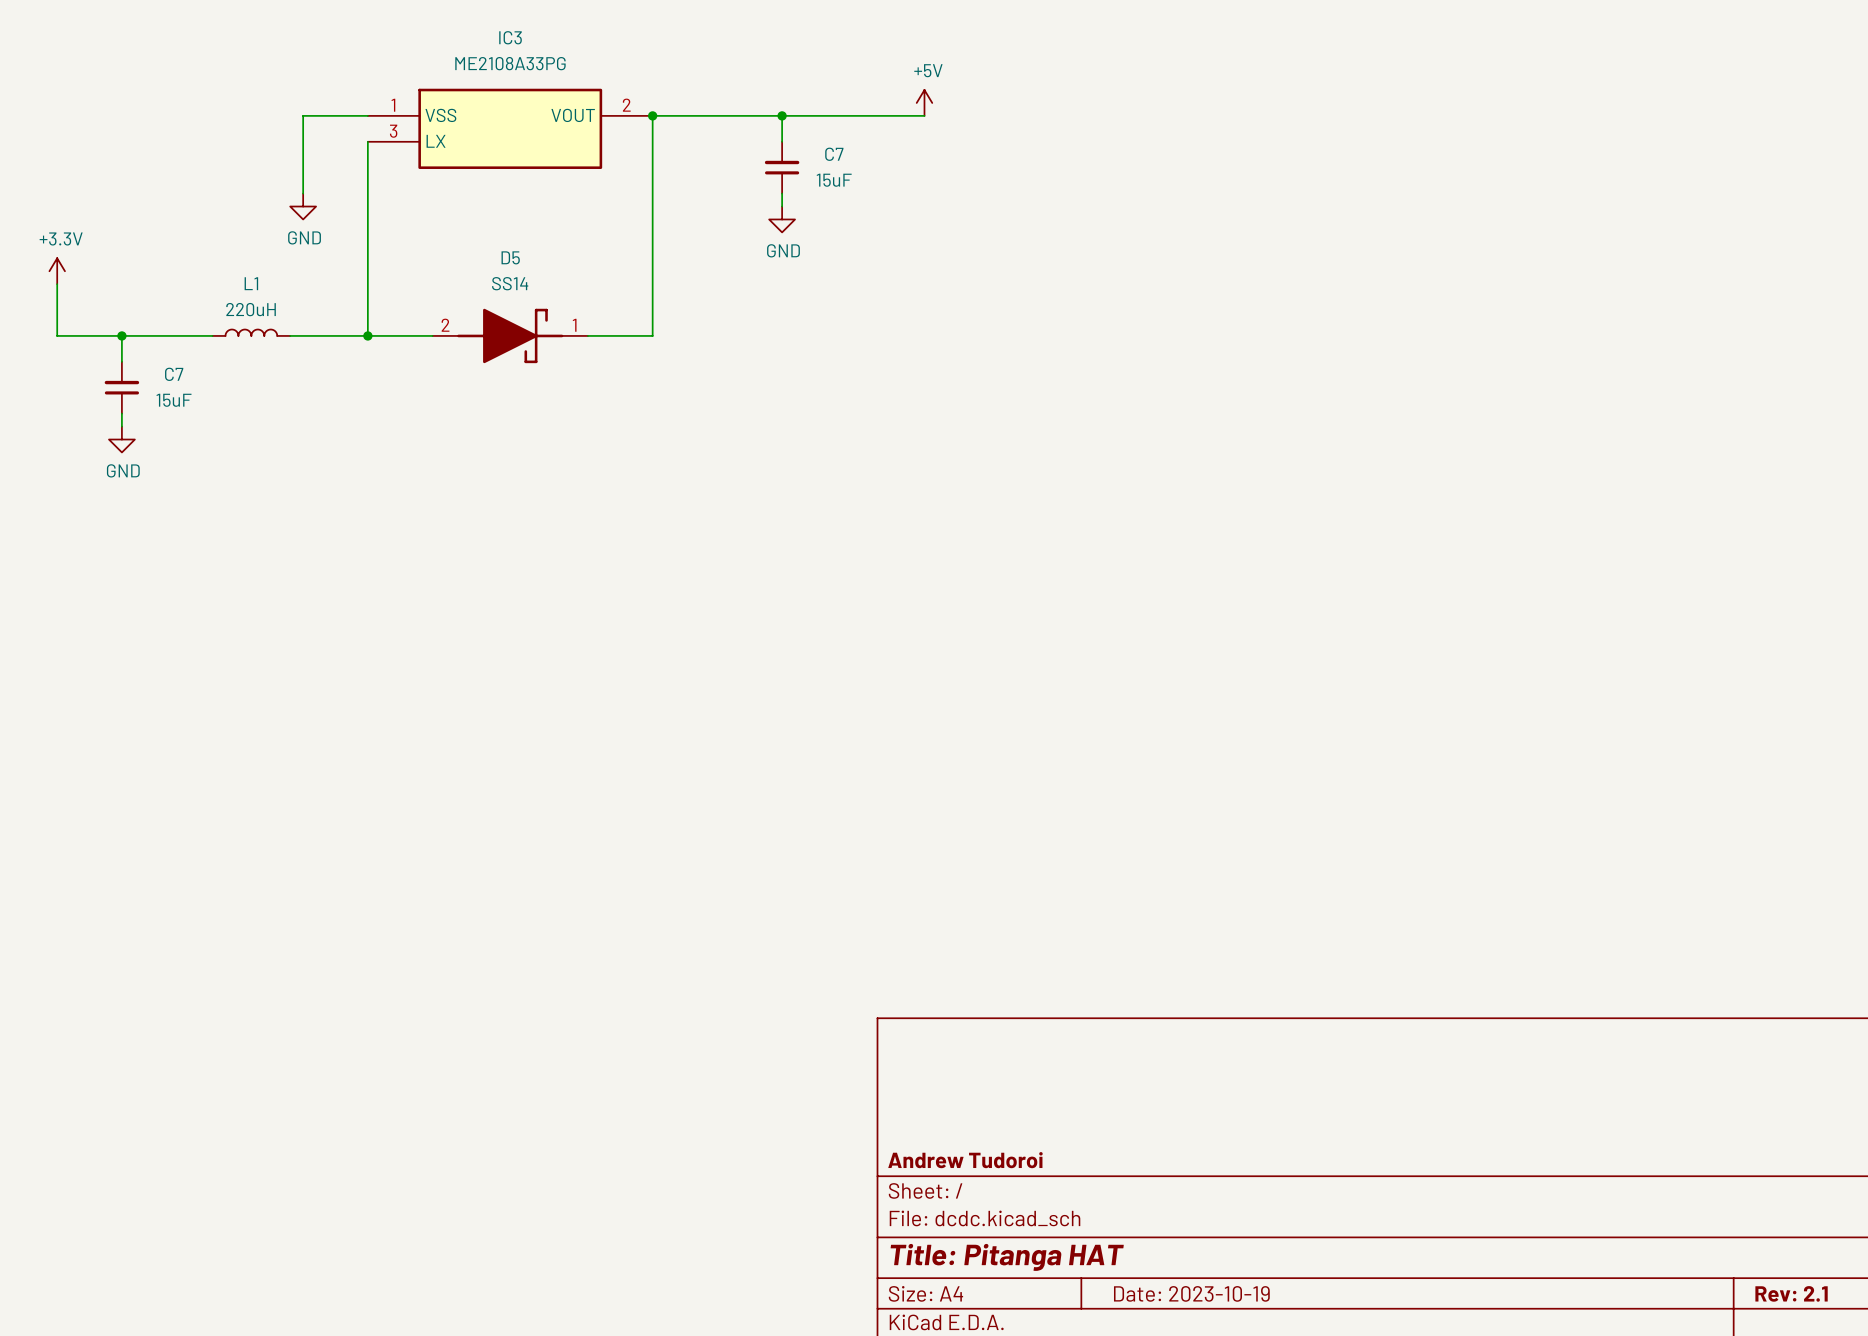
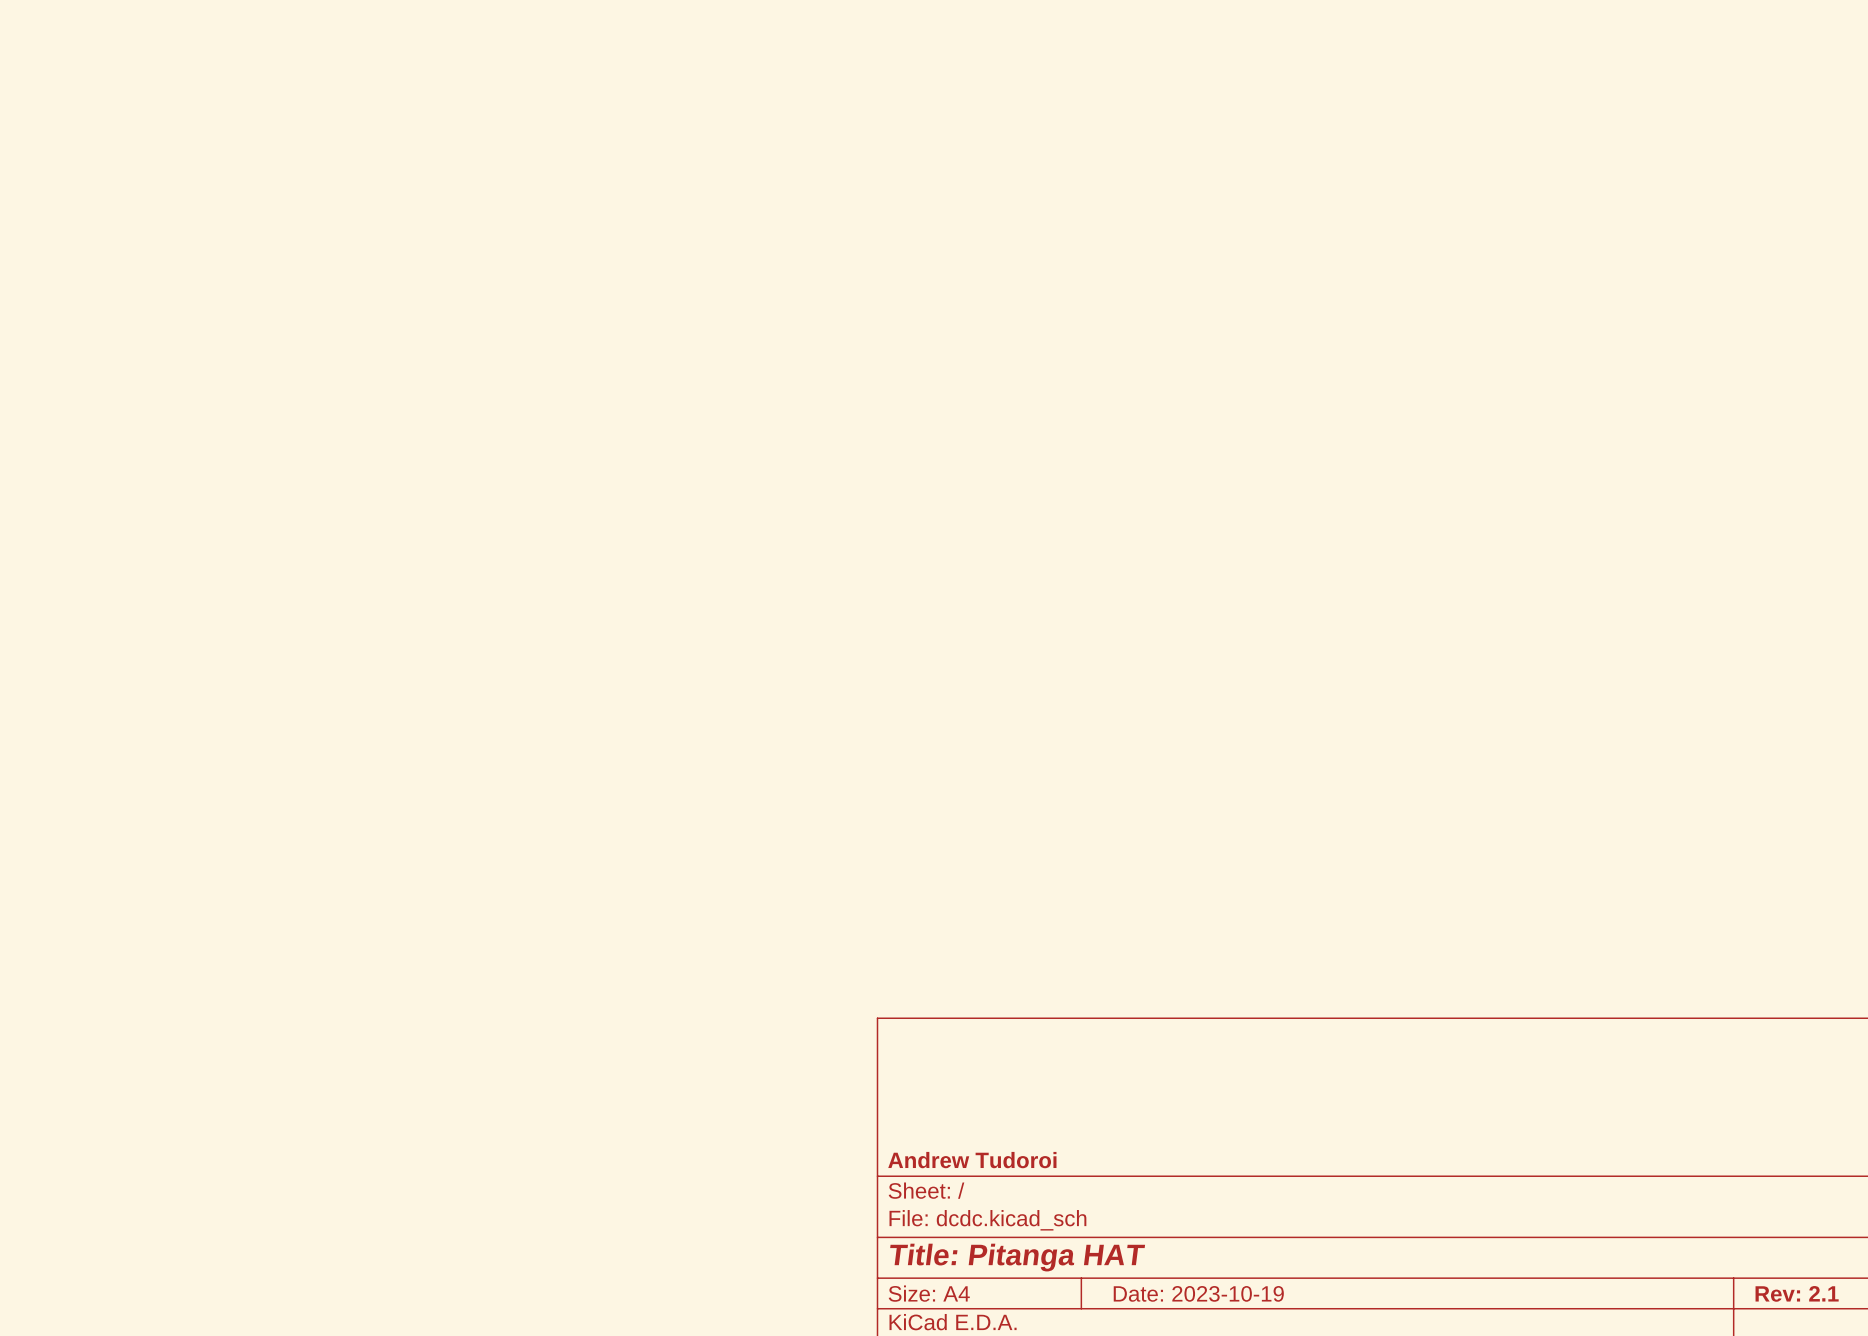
power symbol: +5V (924, 102) -> none
wire: (367, 115) (303, 115) (303, 193) -> none
junction: (652, 115) -> none
wire: (782, 115) (782, 141) -> none
junction: (782, 115) -> none
wire: (924, 115) (652, 115) (652, 335) (587, 335) -> none
IC3: ME2108A33PG (510, 128) -> none
wire: (367, 141) (367, 335) -> none
C7: 15uF (782, 167) -> none
wire: (782, 193) (782, 206) -> none
power symbol: GND (303, 206) -> none
power symbol: GND (782, 219) -> none
power symbol: +3.3V (57, 271) -> none
wire: (57, 284) (57, 335) (212, 335) -> none
L1: 220uH (251, 332) -> none
wire: (121, 335) (121, 361) -> none
junction: (121, 335) -> none
wire: (290, 335) (432, 335) -> none
junction: (367, 335) -> none
D5: SS14 (510, 335) -> none
C7: 15uF (121, 387) -> none
wire: (121, 413) (121, 426) -> none
power symbol: GND (121, 439) -> none

